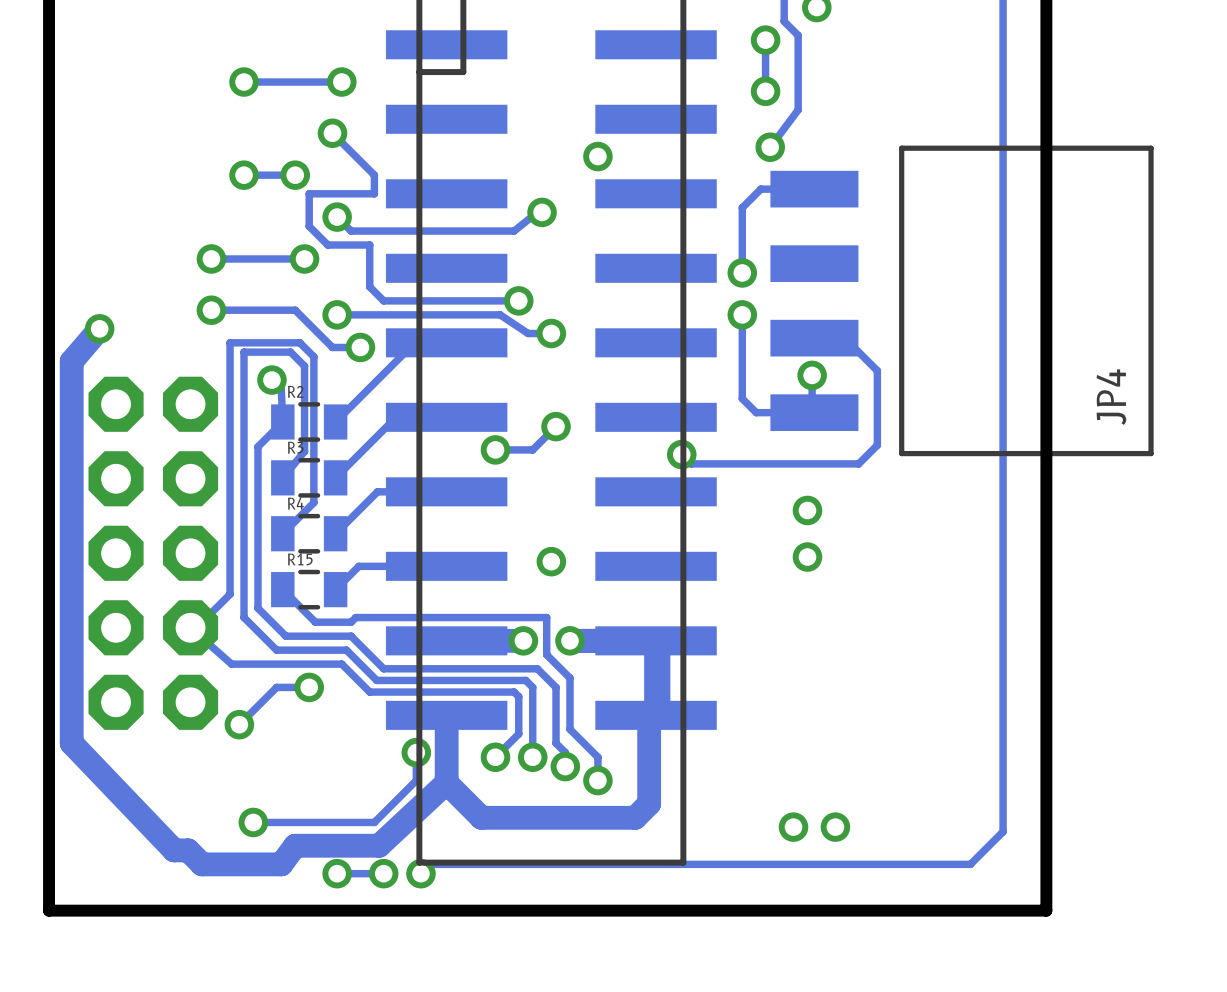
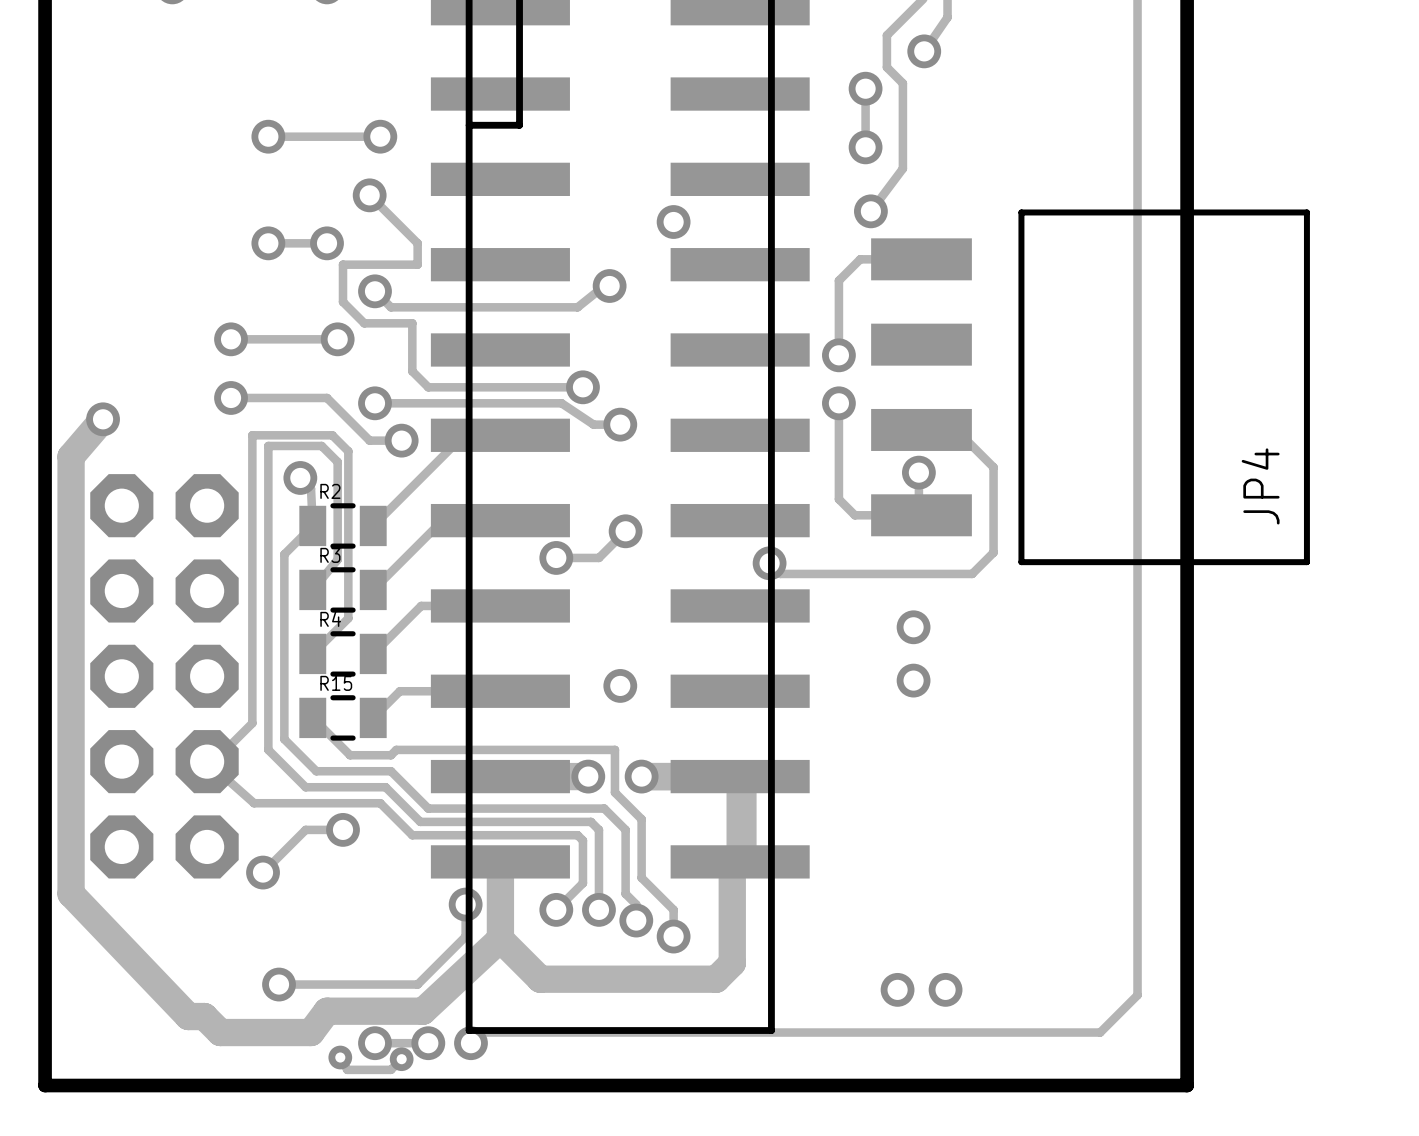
track: none -> (340, 1057) (347, 1069) (390, 1069) (401, 1059)
via: none -> (340, 1057)
via: none -> (401, 1059)

